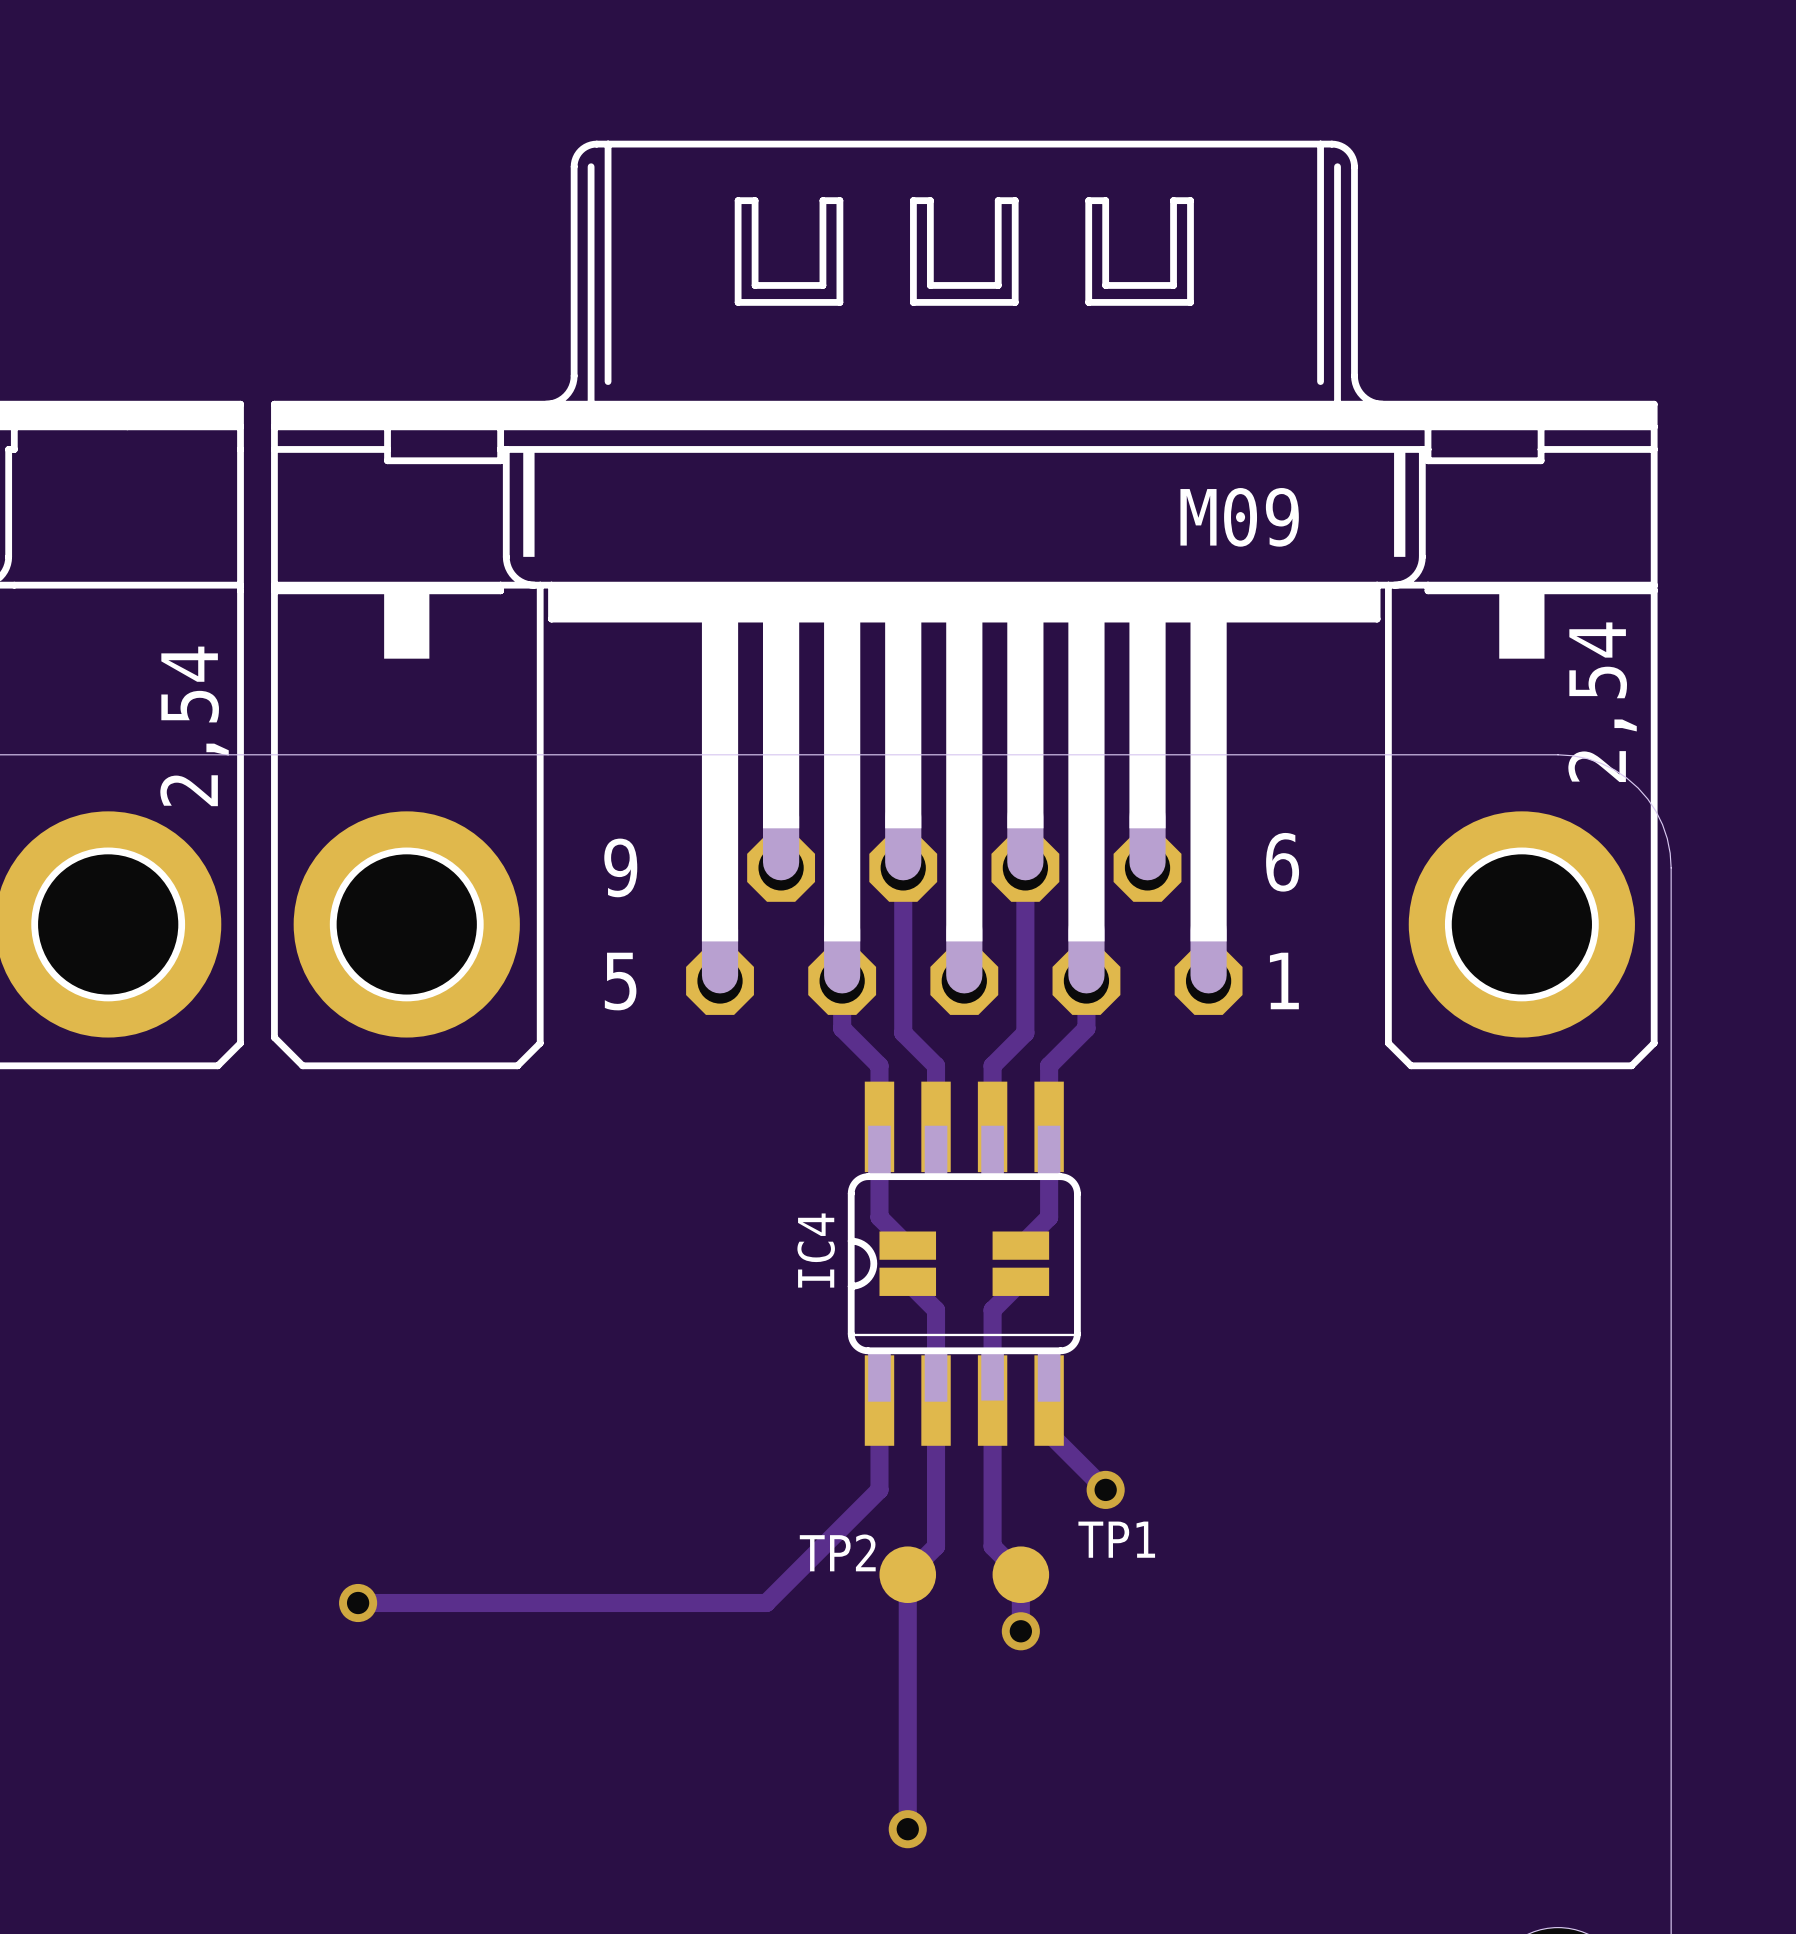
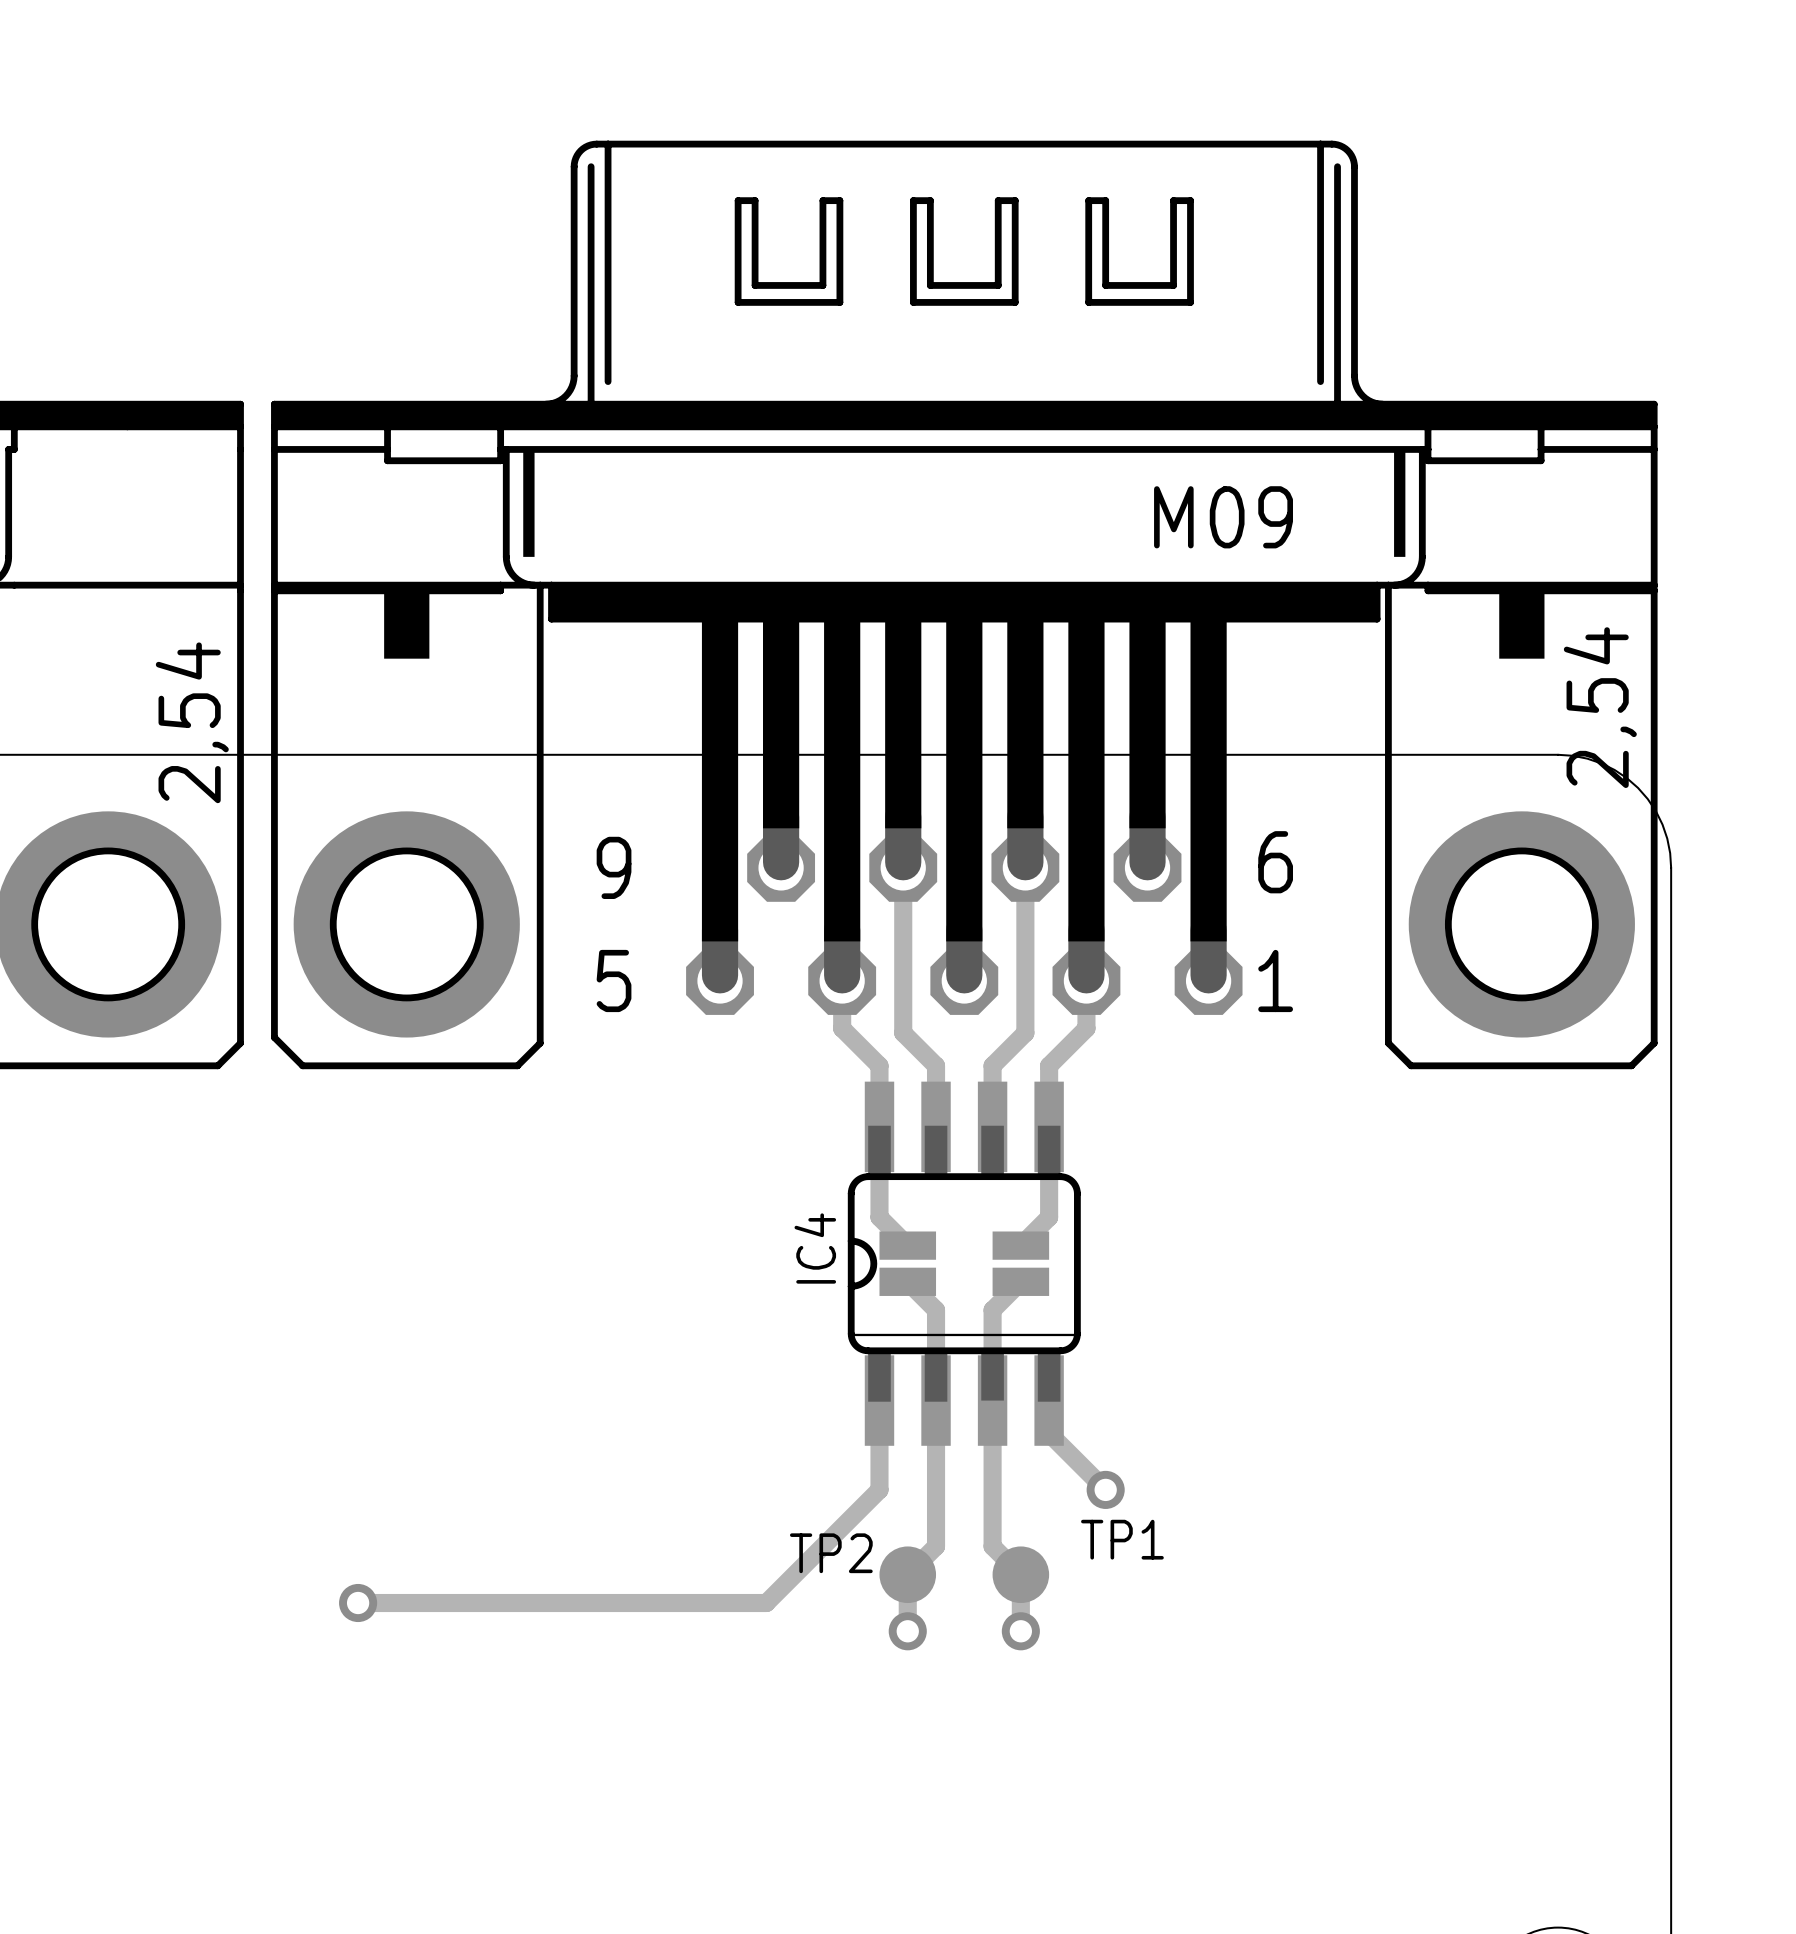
track: (907, 1631) (907, 1829) -> none
via position: (907, 1829) -> (907, 1631)

